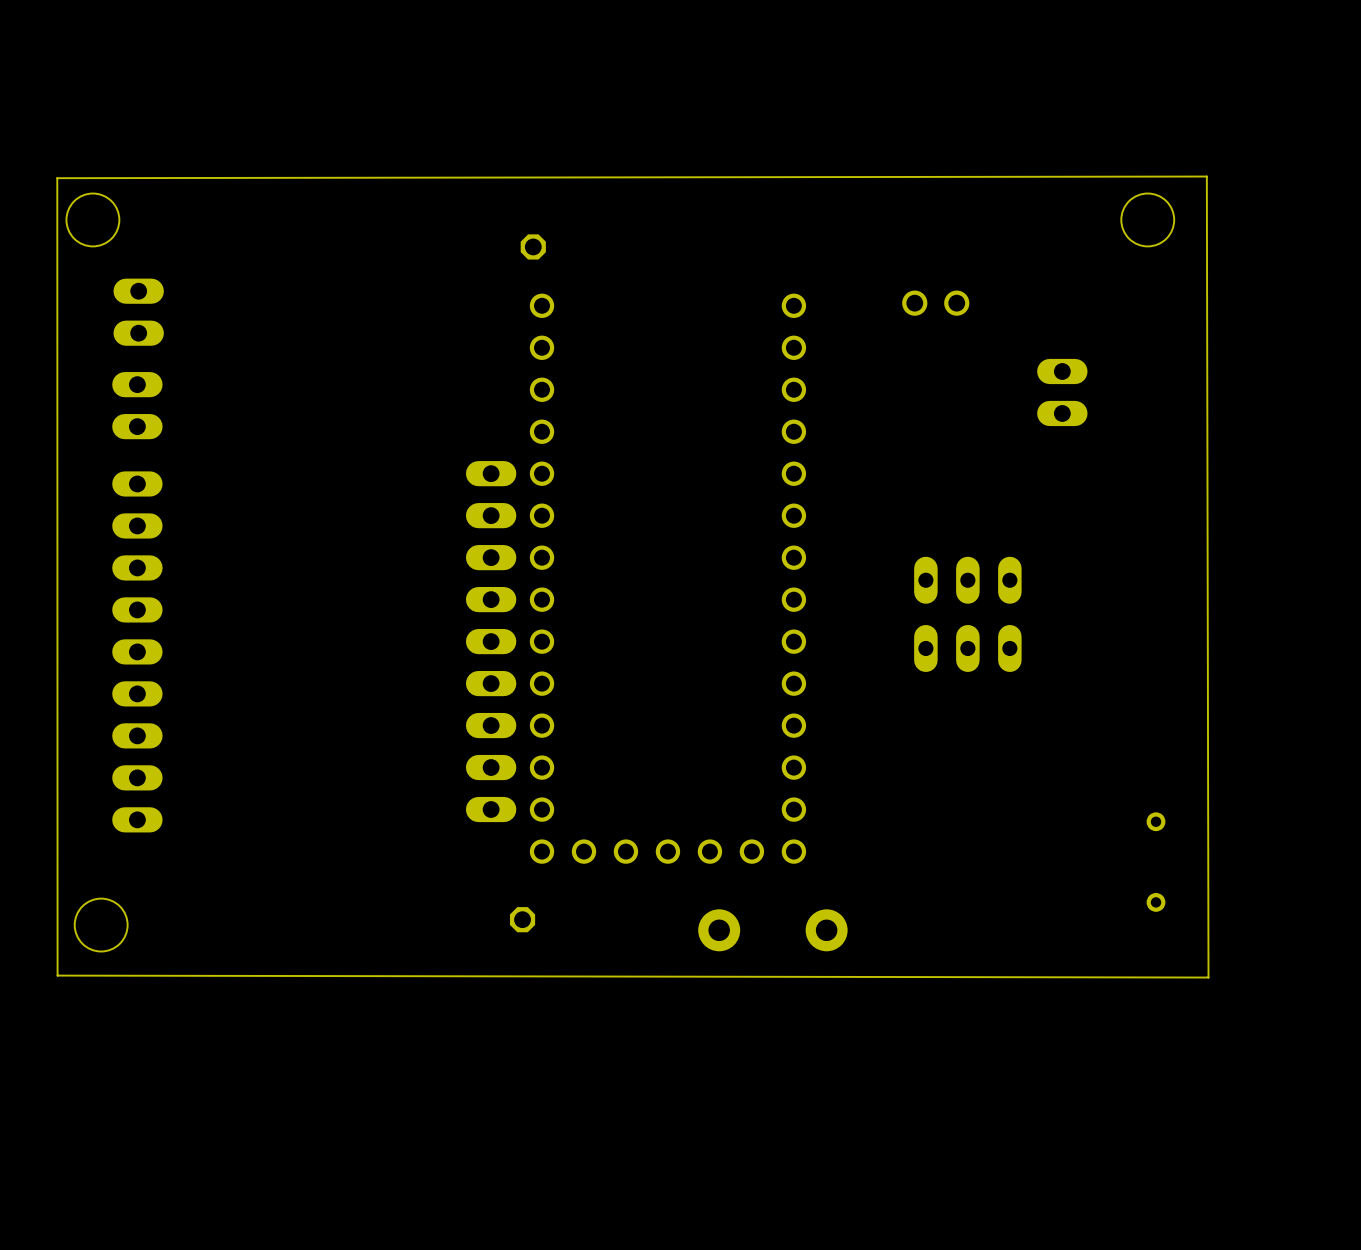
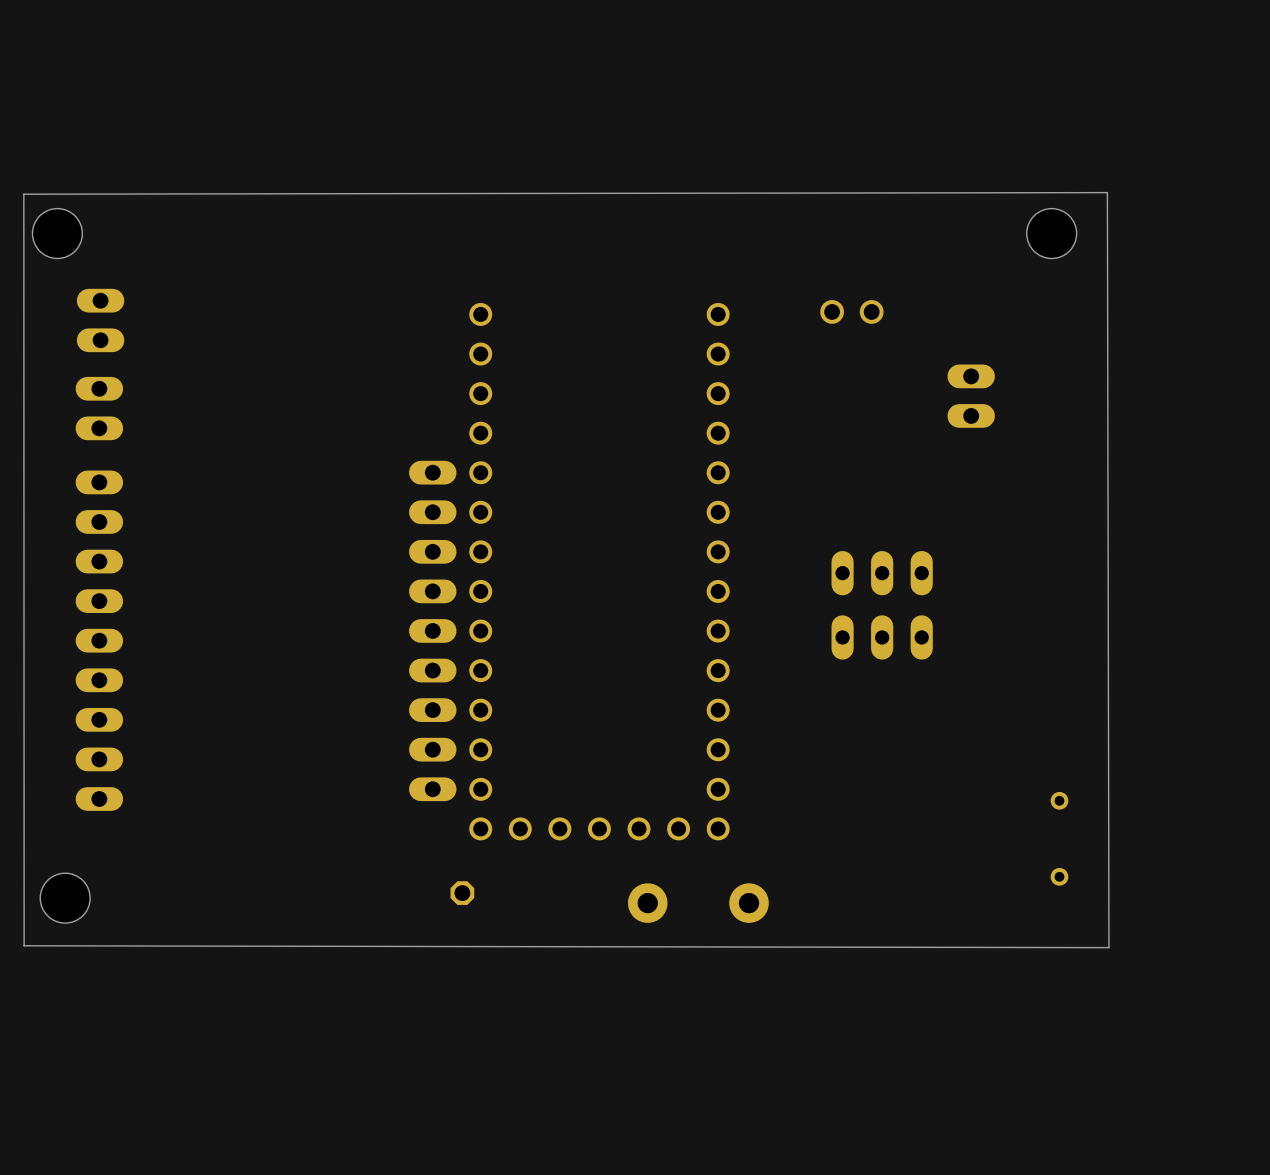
part: (533, 246) -> none

